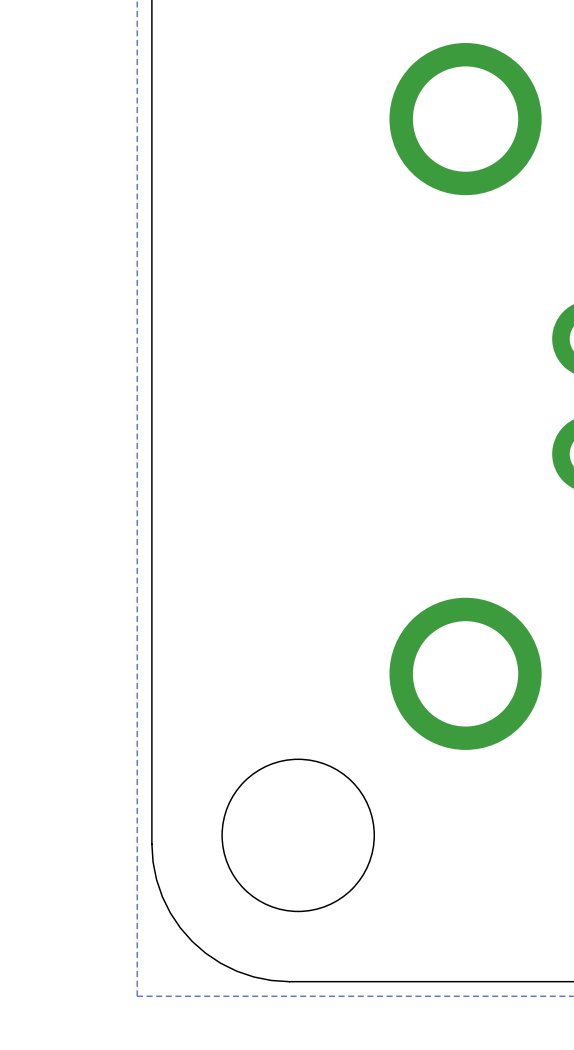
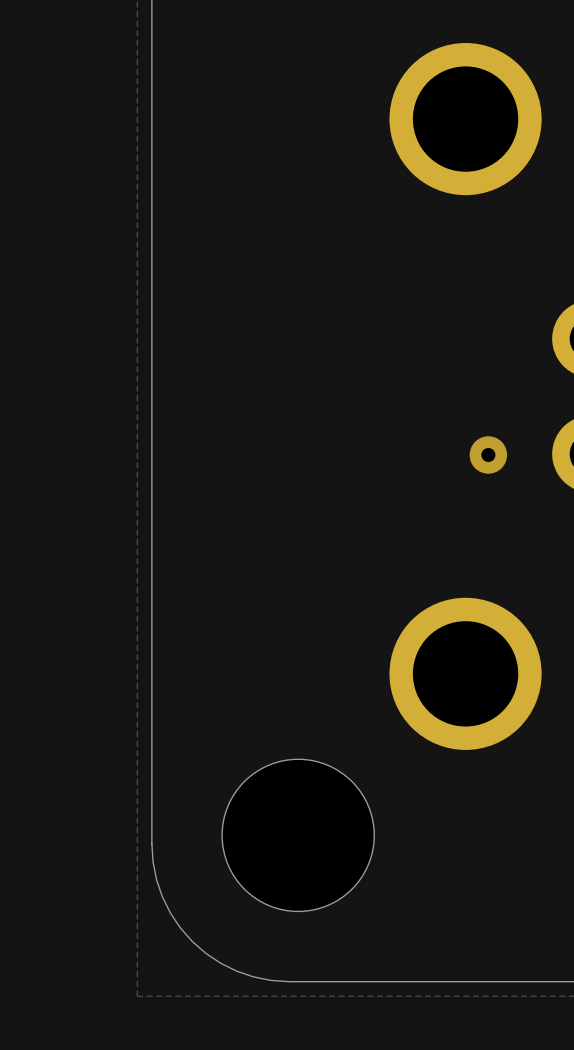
via: none -> (488, 454)

